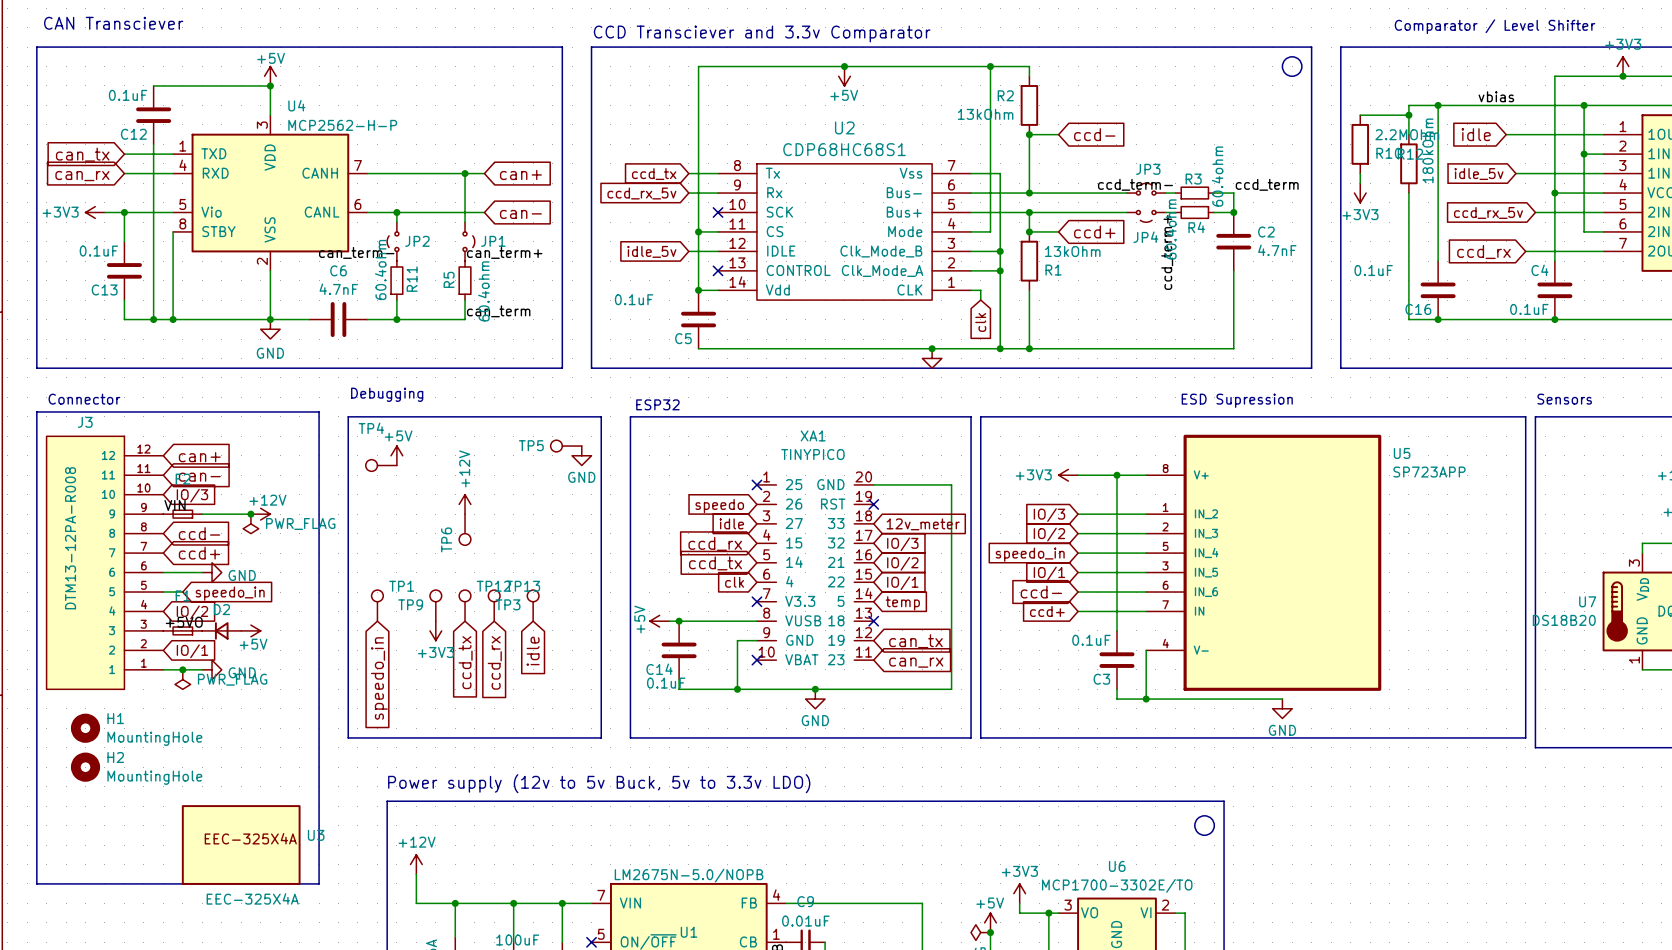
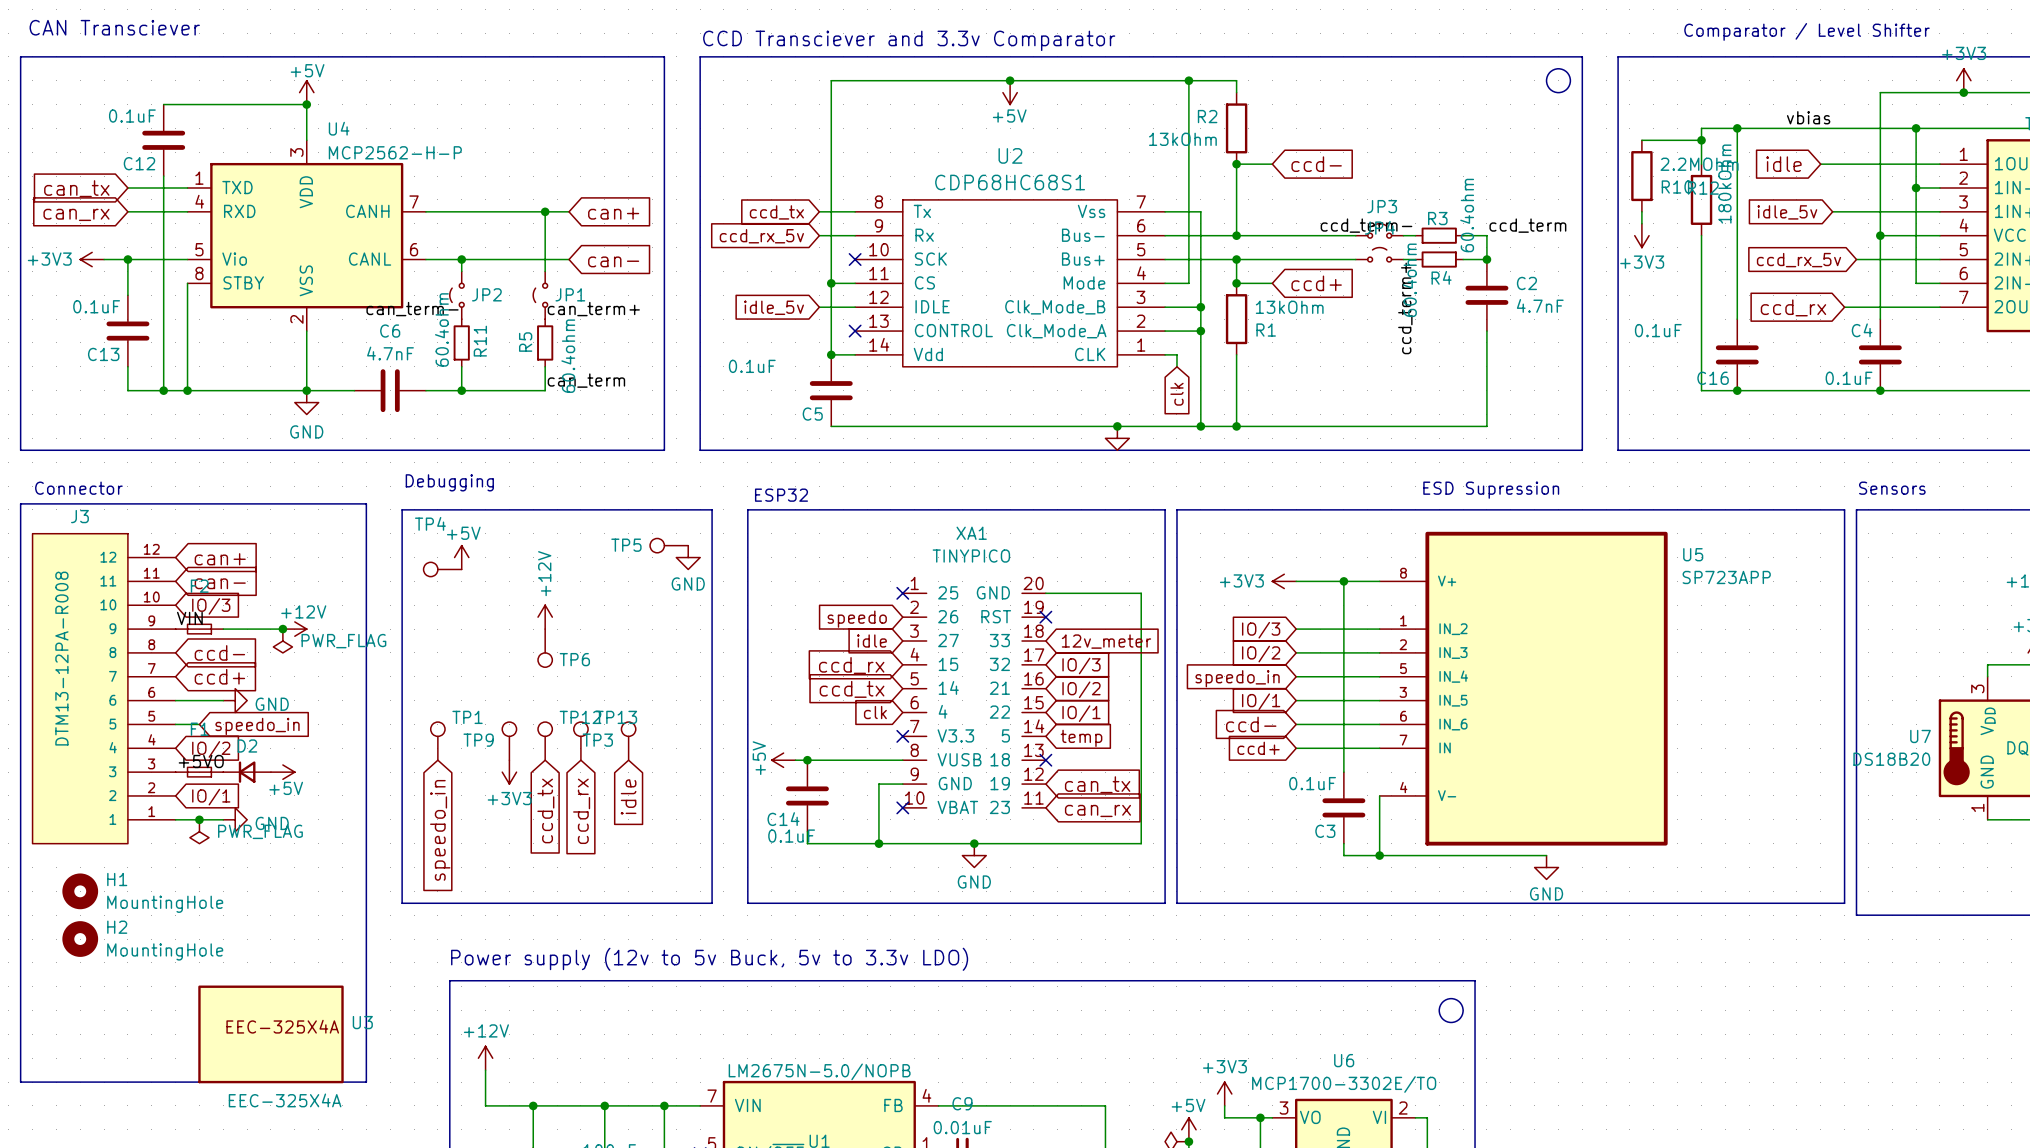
JP4 rotation: 0° (1146, 216) -> 180° (1379, 254)
JP1 rotation: 0° (468, 241) -> 180° (540, 295)
TP6 name rotation: 0° (446, 539) -> 90° clockwise (574, 659)
TP6 name position: TP6 (446, 539) -> TP6 (574, 659)

